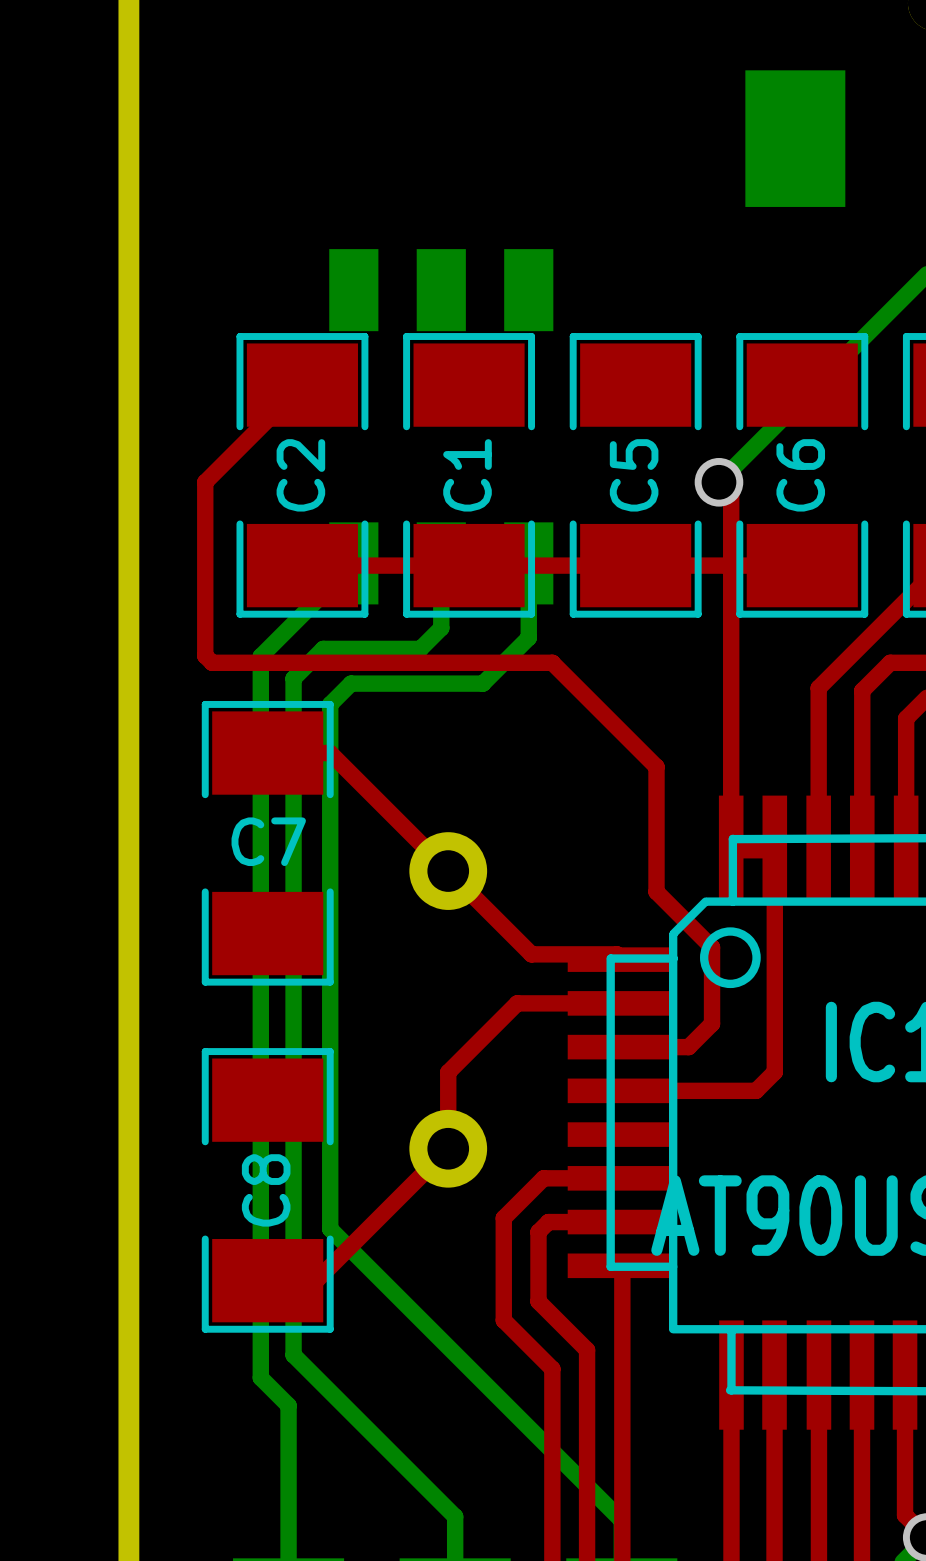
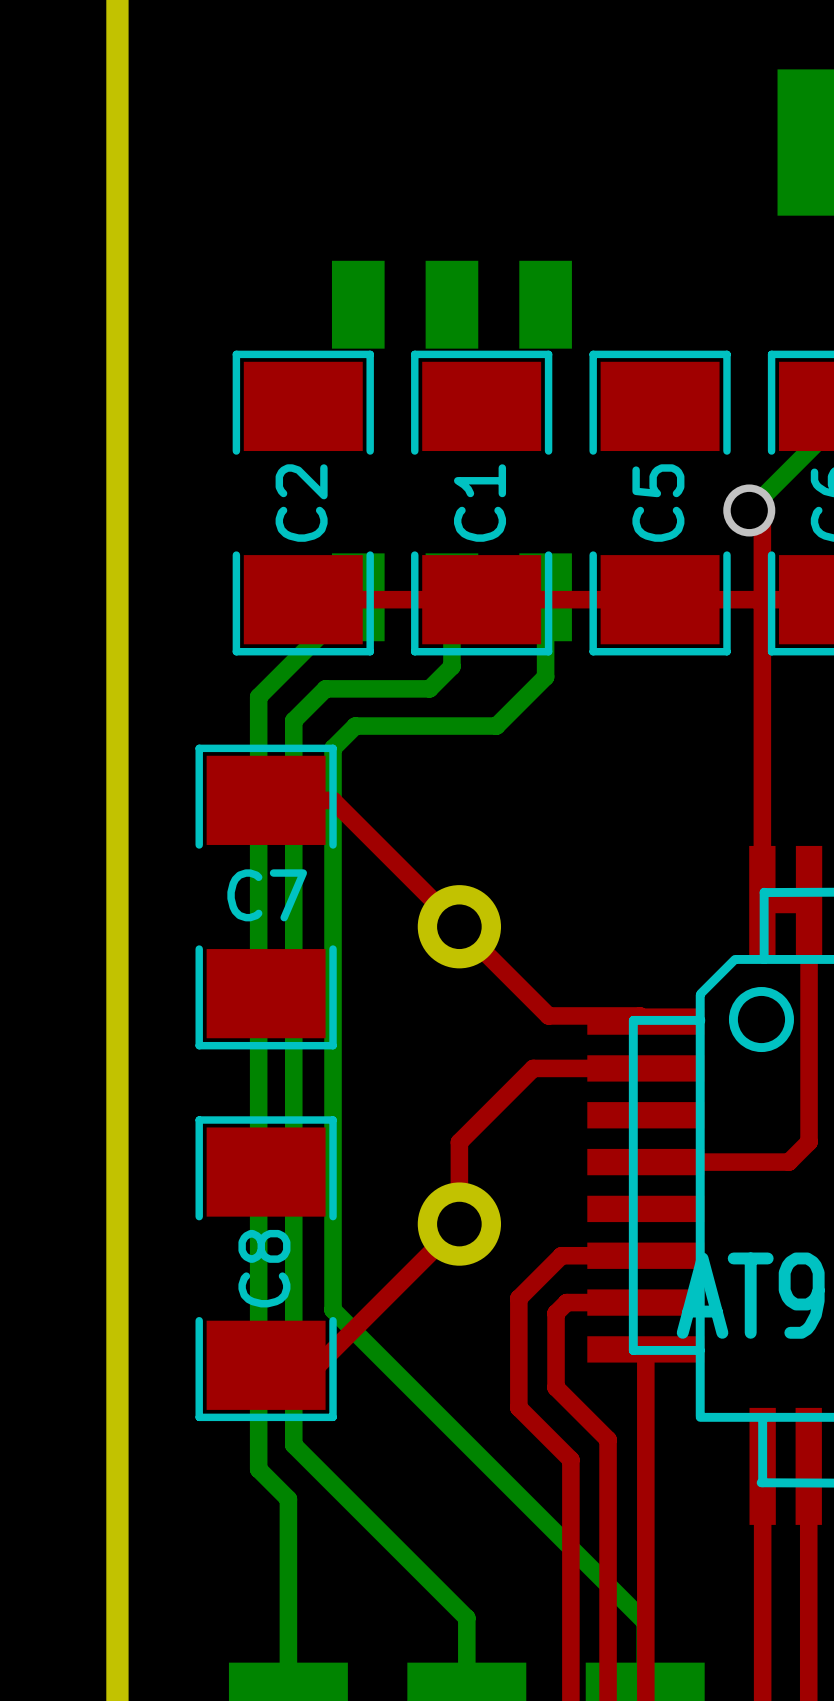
top track: (302, 385) (205, 482) (205, 655) (212, 662) (552, 662) (656, 766) (656, 891) (712, 947) (712, 1023) (688, 1047) (622, 1047) -> none

